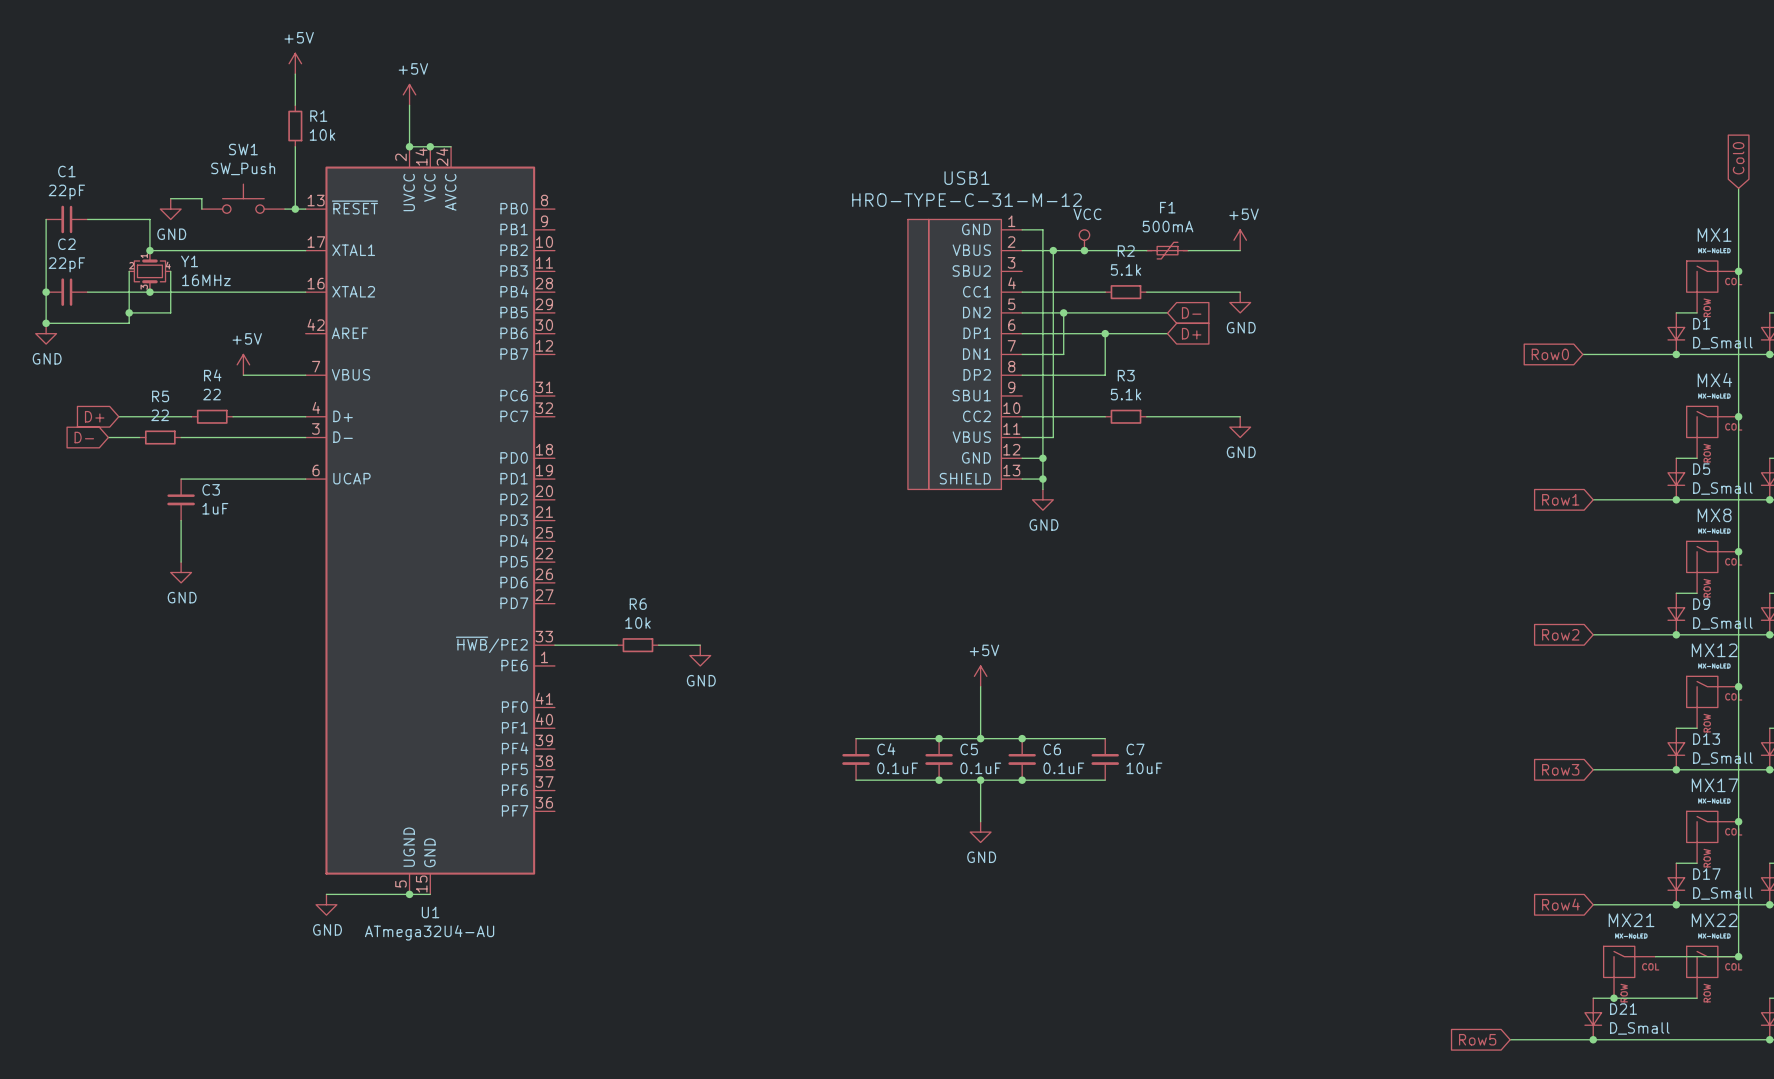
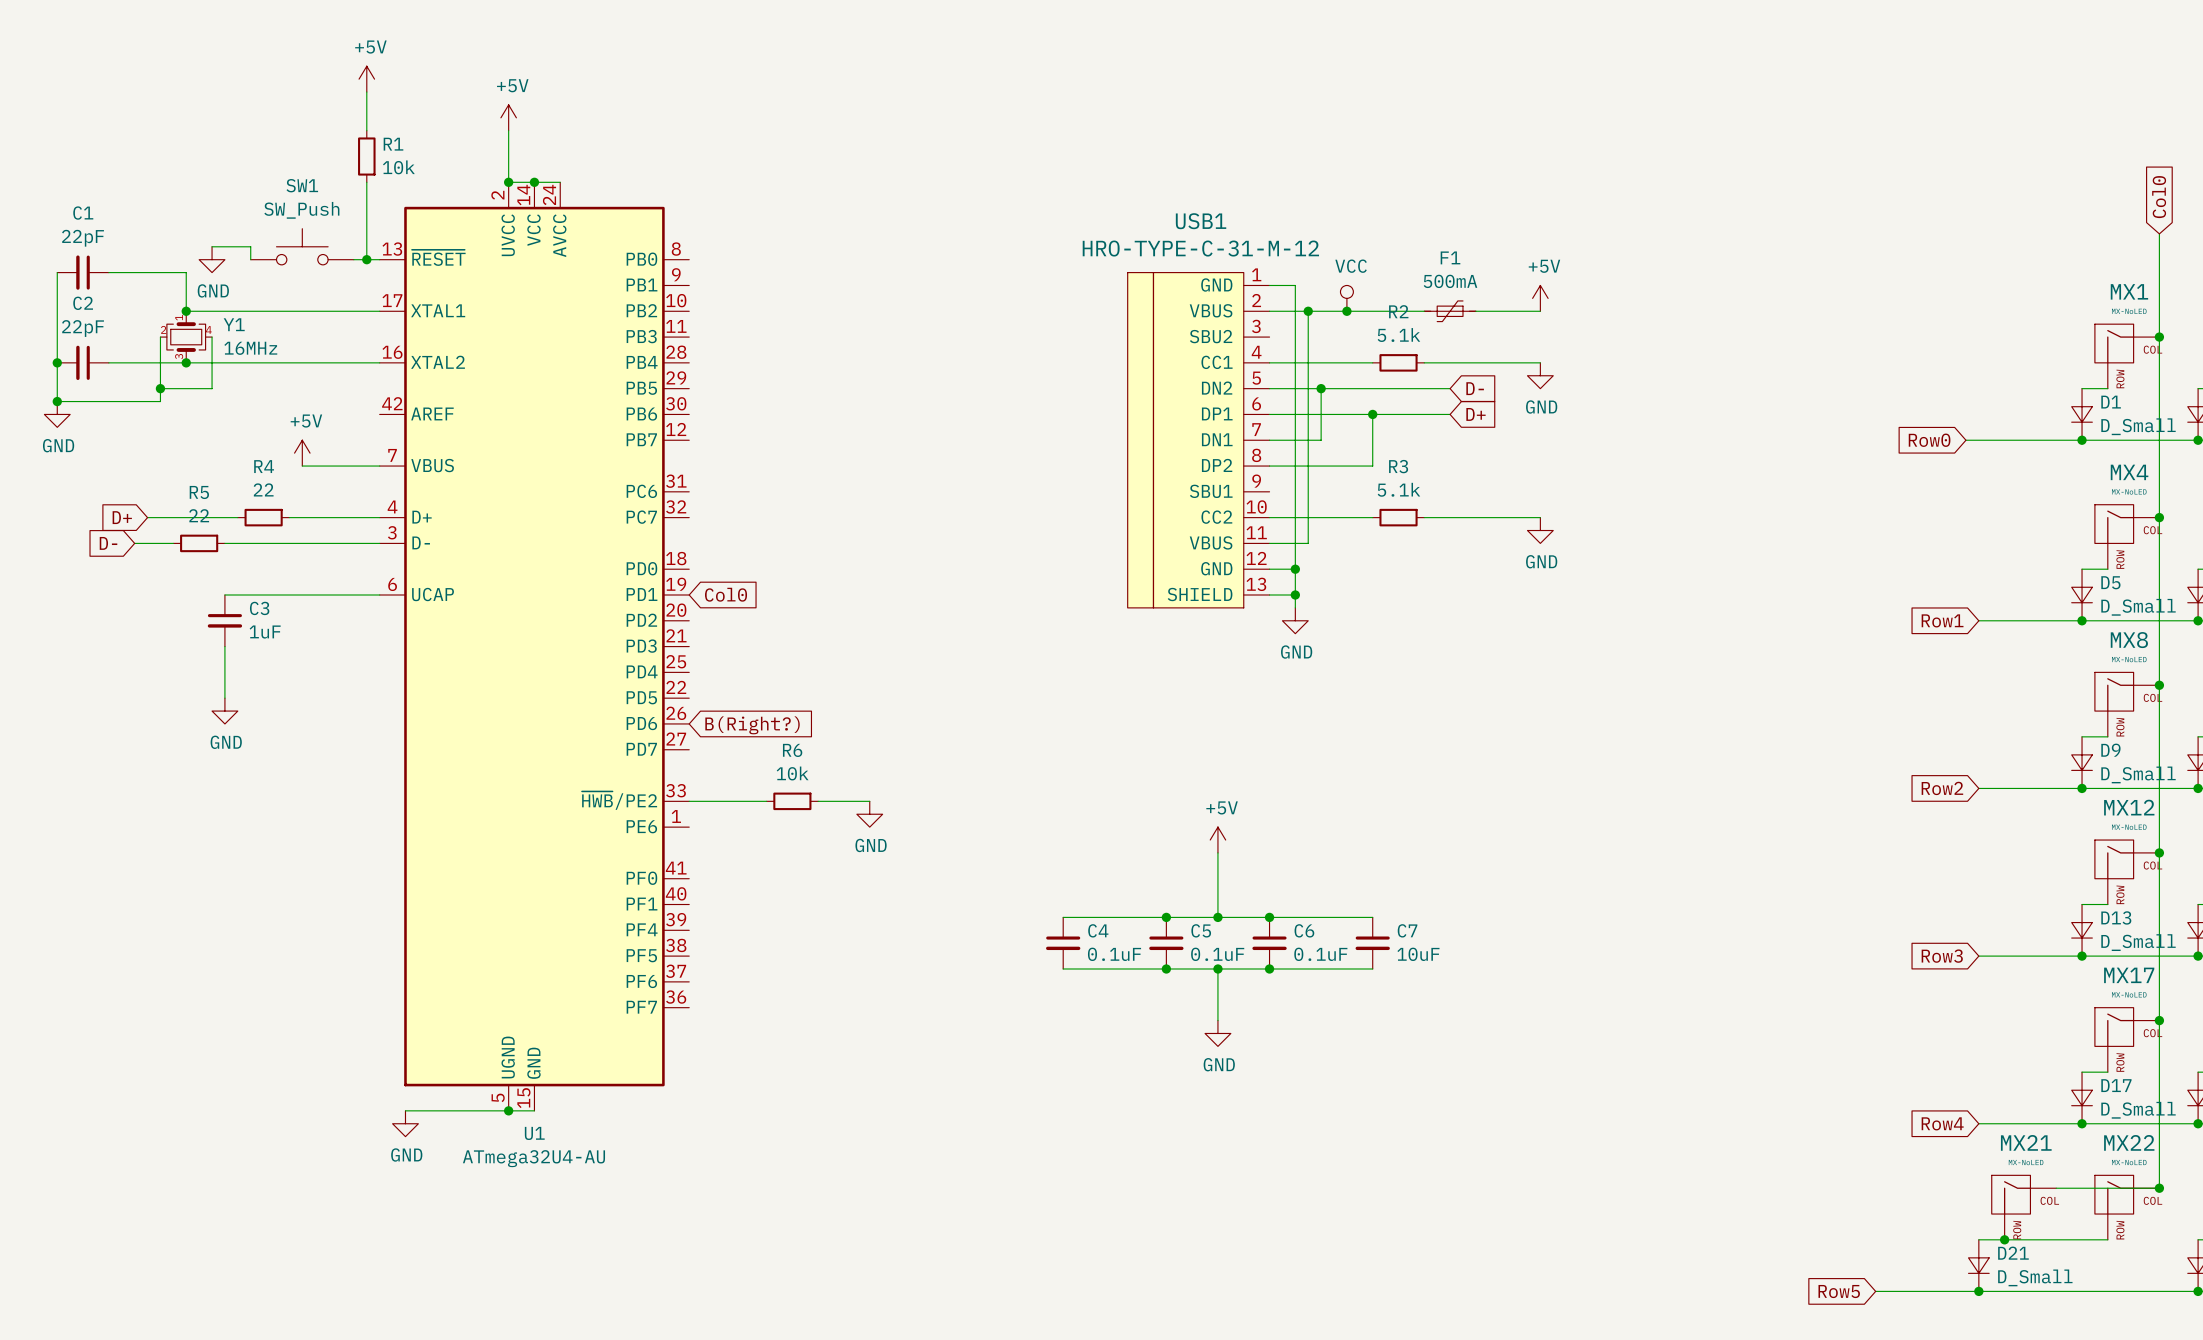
global label: none -> Col0 (726, 594)
global label: none -> B(Right?) (752, 725)

